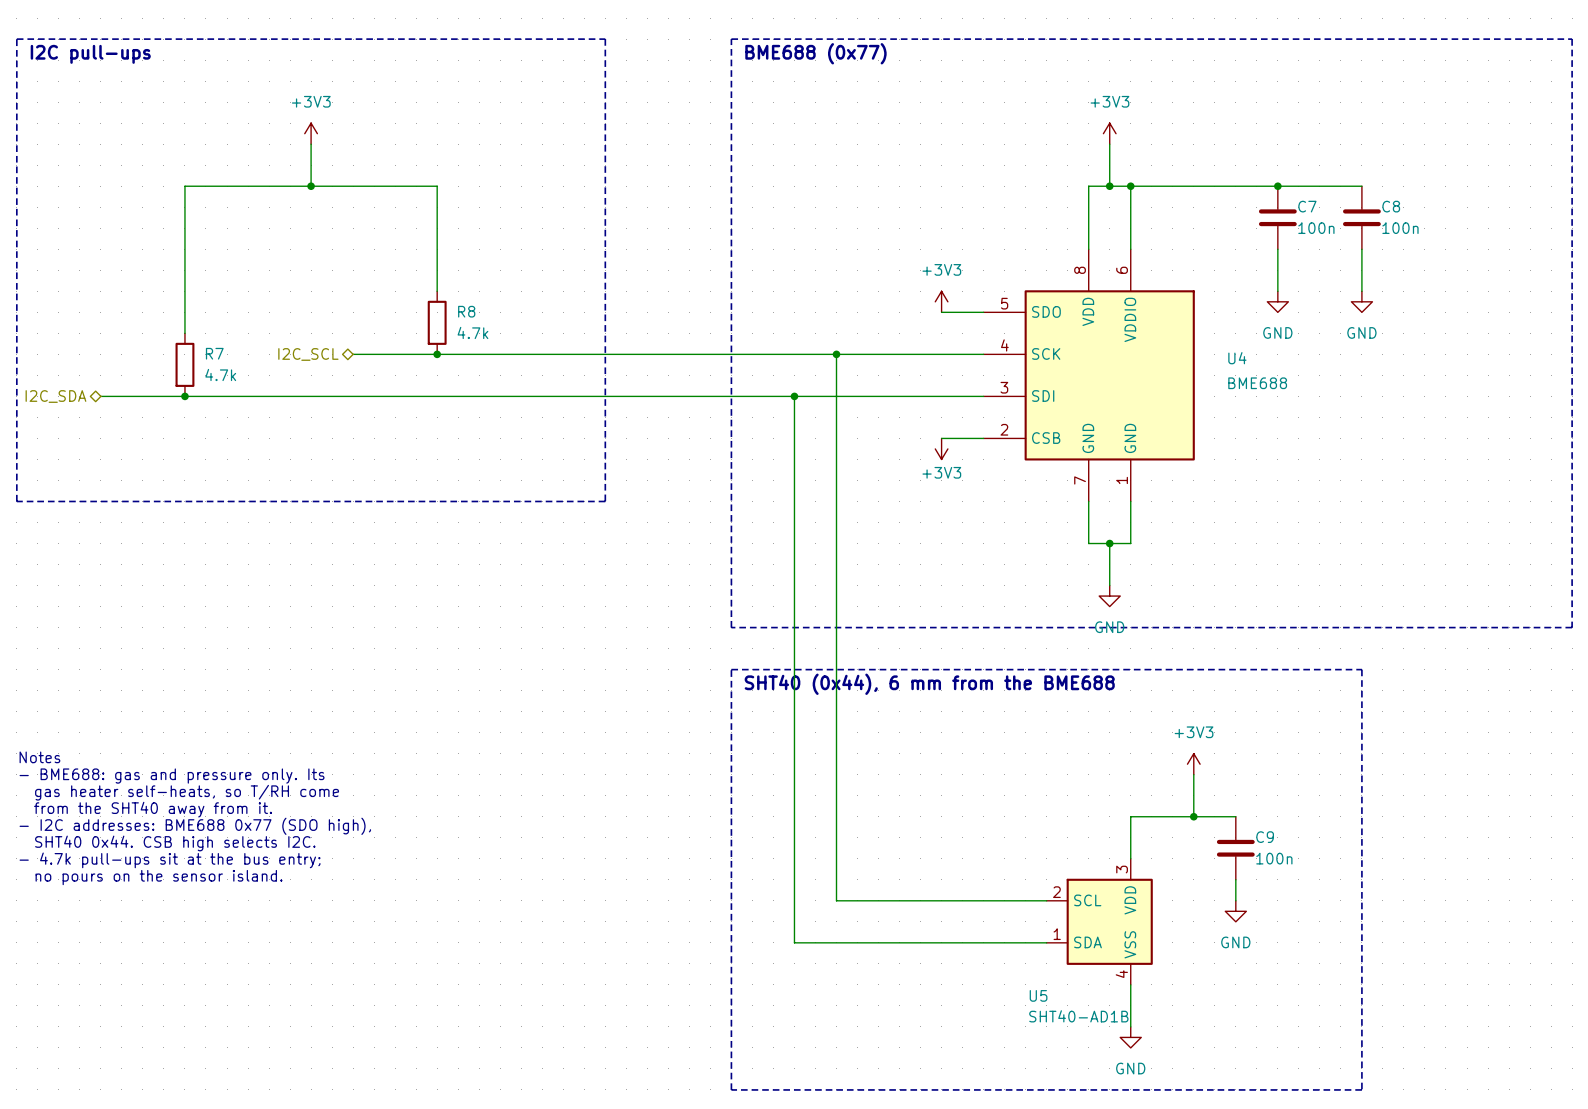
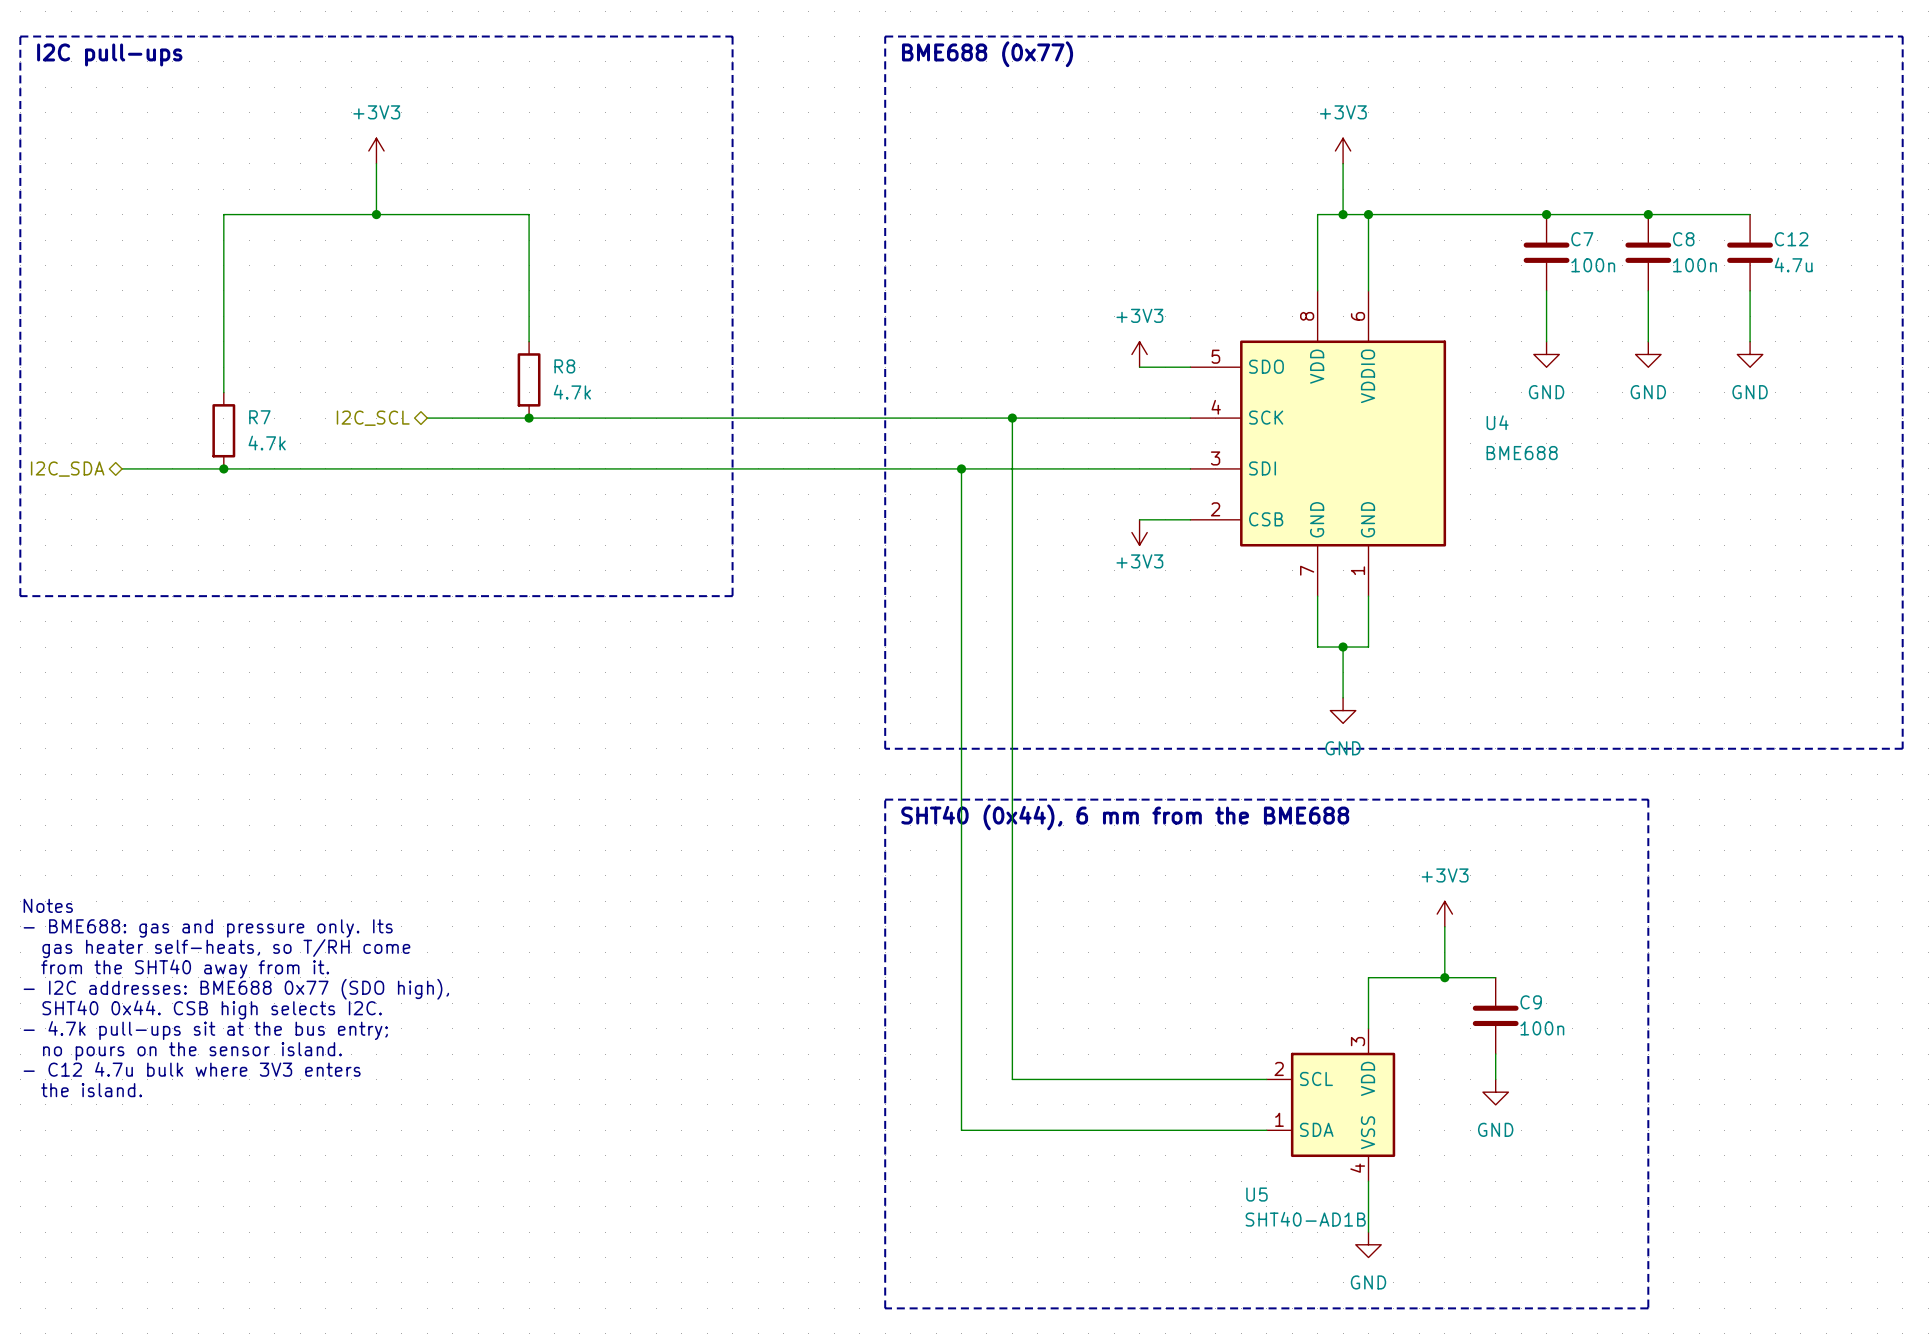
wire: none -> (1648, 214) (1750, 214)
junction: none -> (1648, 214)
C12: none -> 4.7u (1750, 252)
wire: none -> (1750, 290) (1750, 341)
power symbol: none -> GND (1750, 354)
text: none -> - C12 4.7u bulk where 3V3 enters (192, 1069)
text: none -> the island. (91, 1090)

